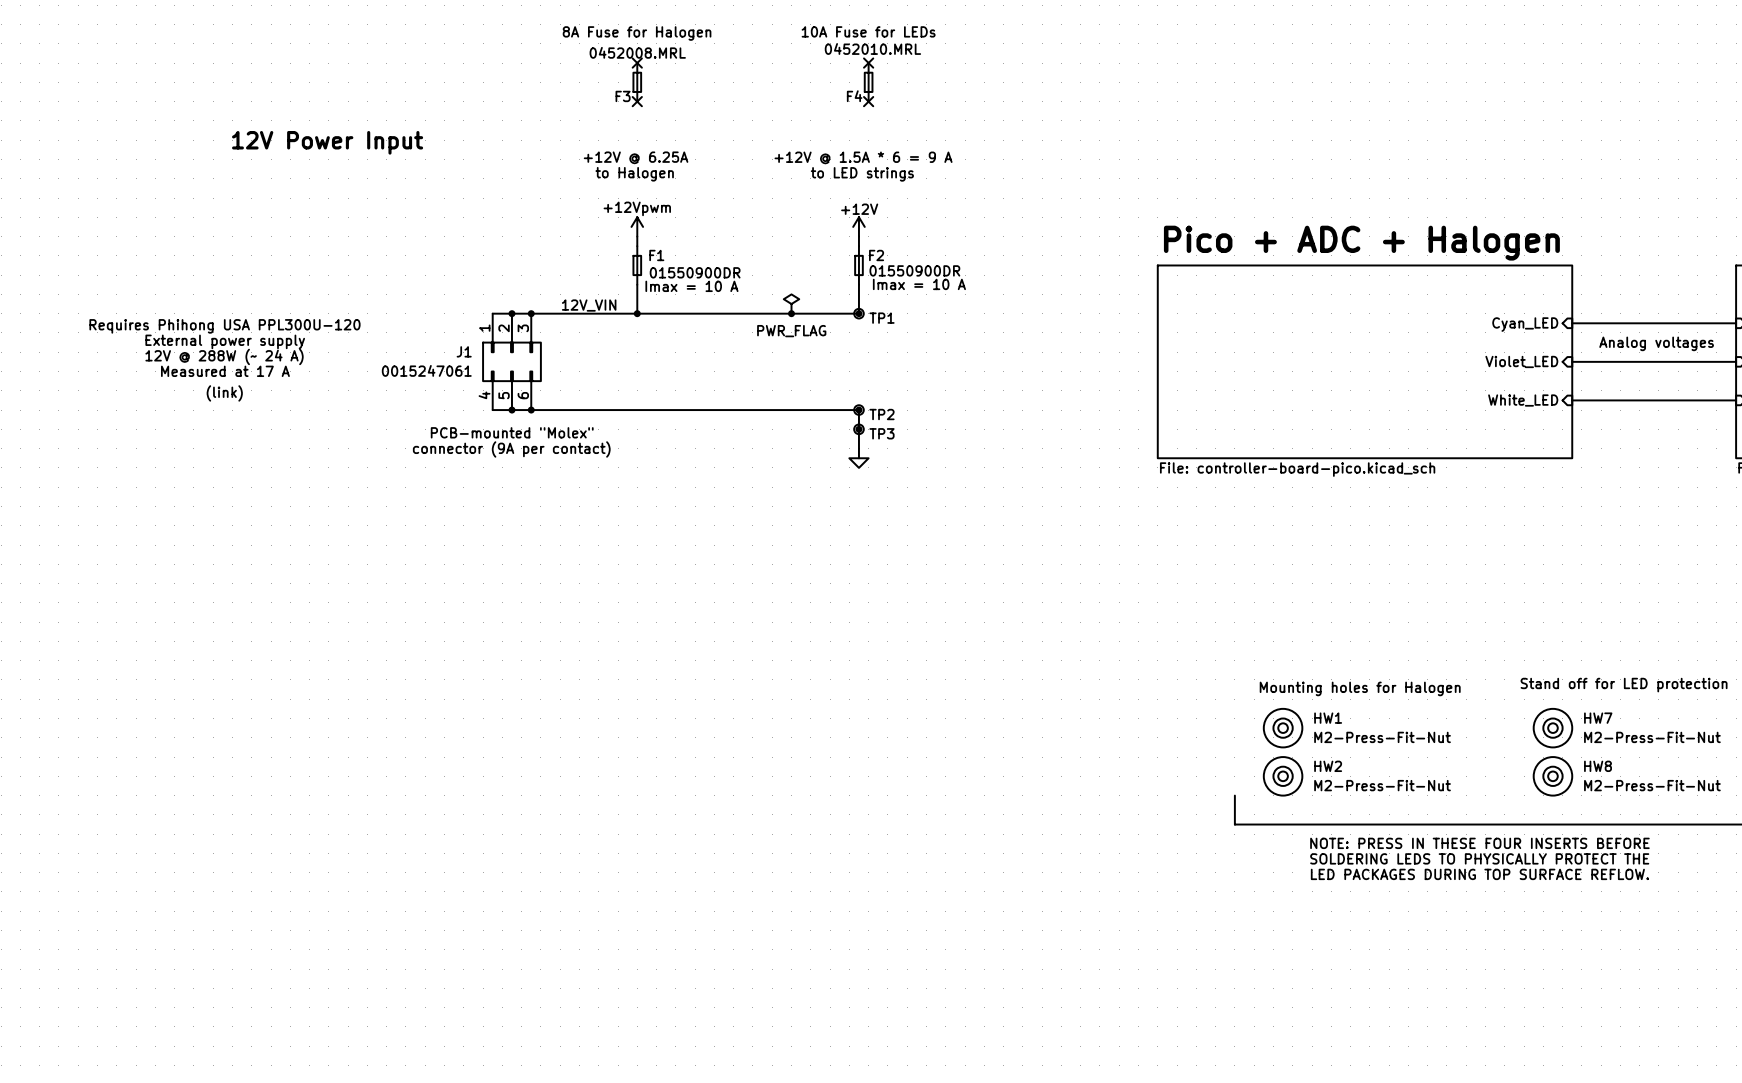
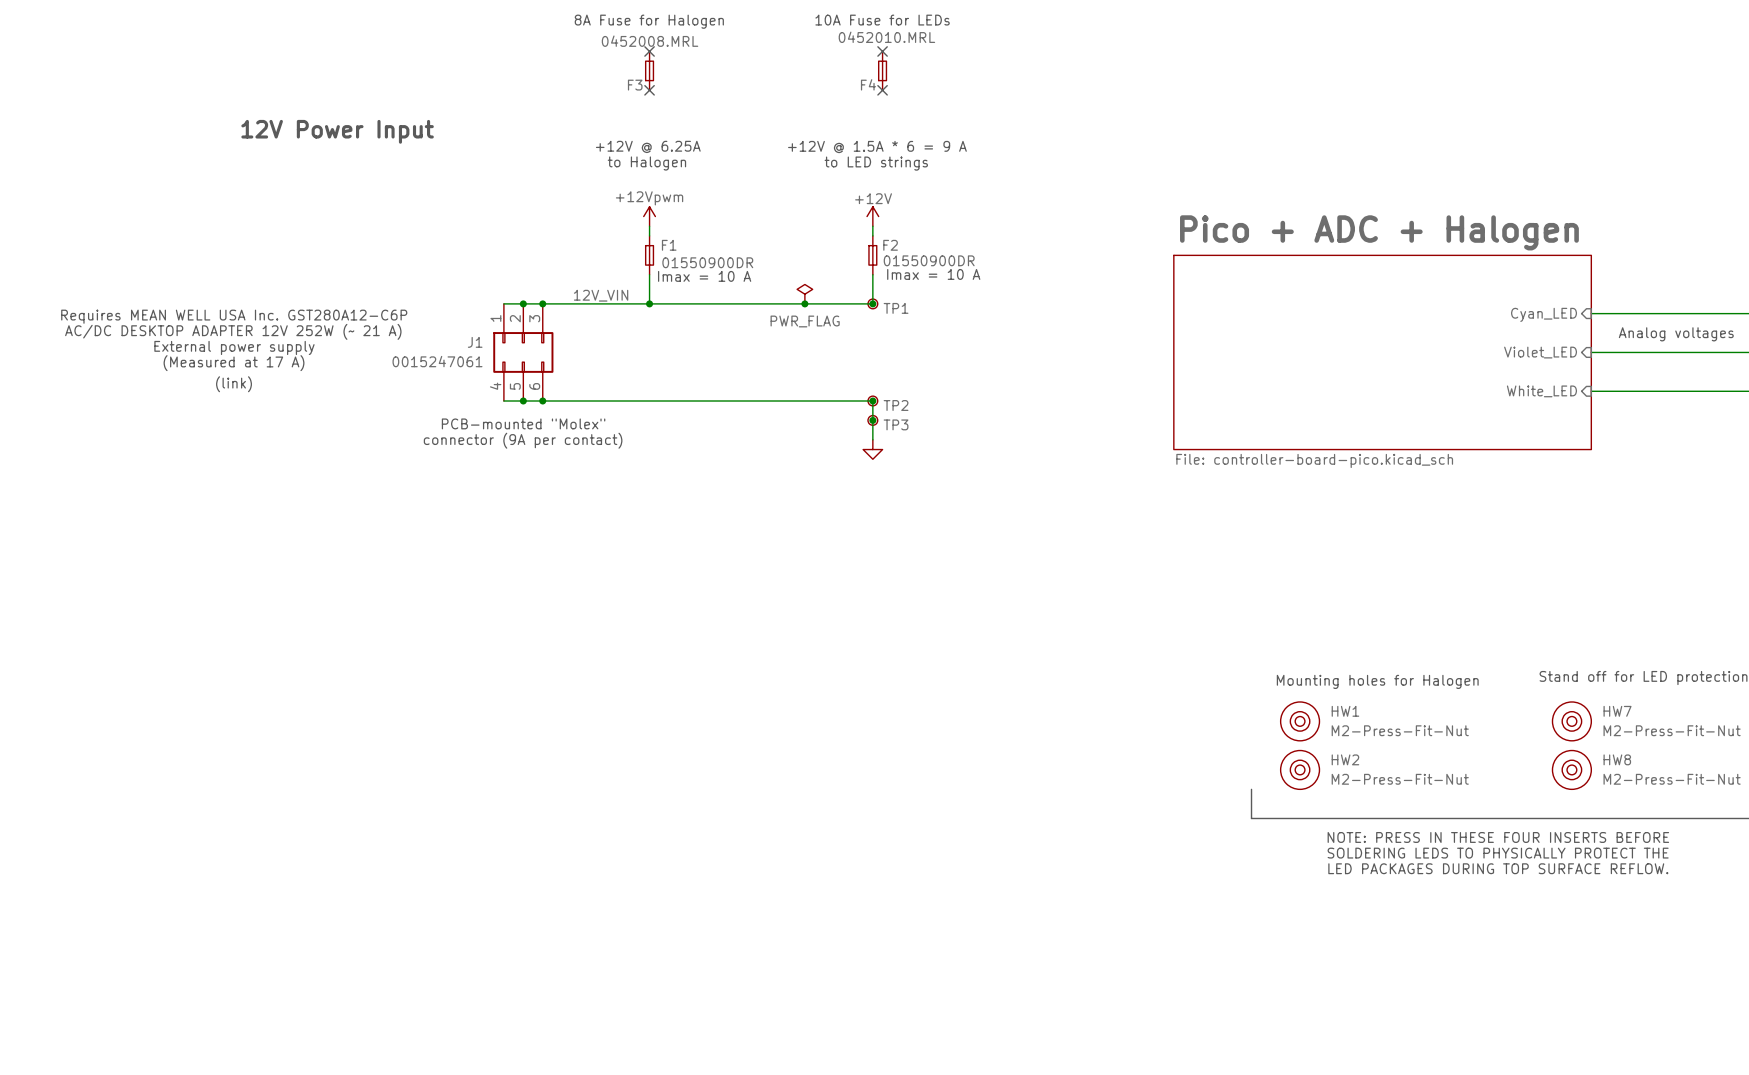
text: Requires Phihong USA PPL300U-120 (224, 326) -> Requires MEAN WELL USA Inc. GST280A12-C6P (234, 316)
text: External power supply (225, 341) -> AC/DC DESKTOP ADAPTER 12V 252W (~ 21 A) (233, 331)
text: 12V @ 288W (~ 24 A) (224, 356) -> External power supply (234, 347)
text: Measured at 17 A (225, 371) -> (Measured at 17 A) (234, 363)

